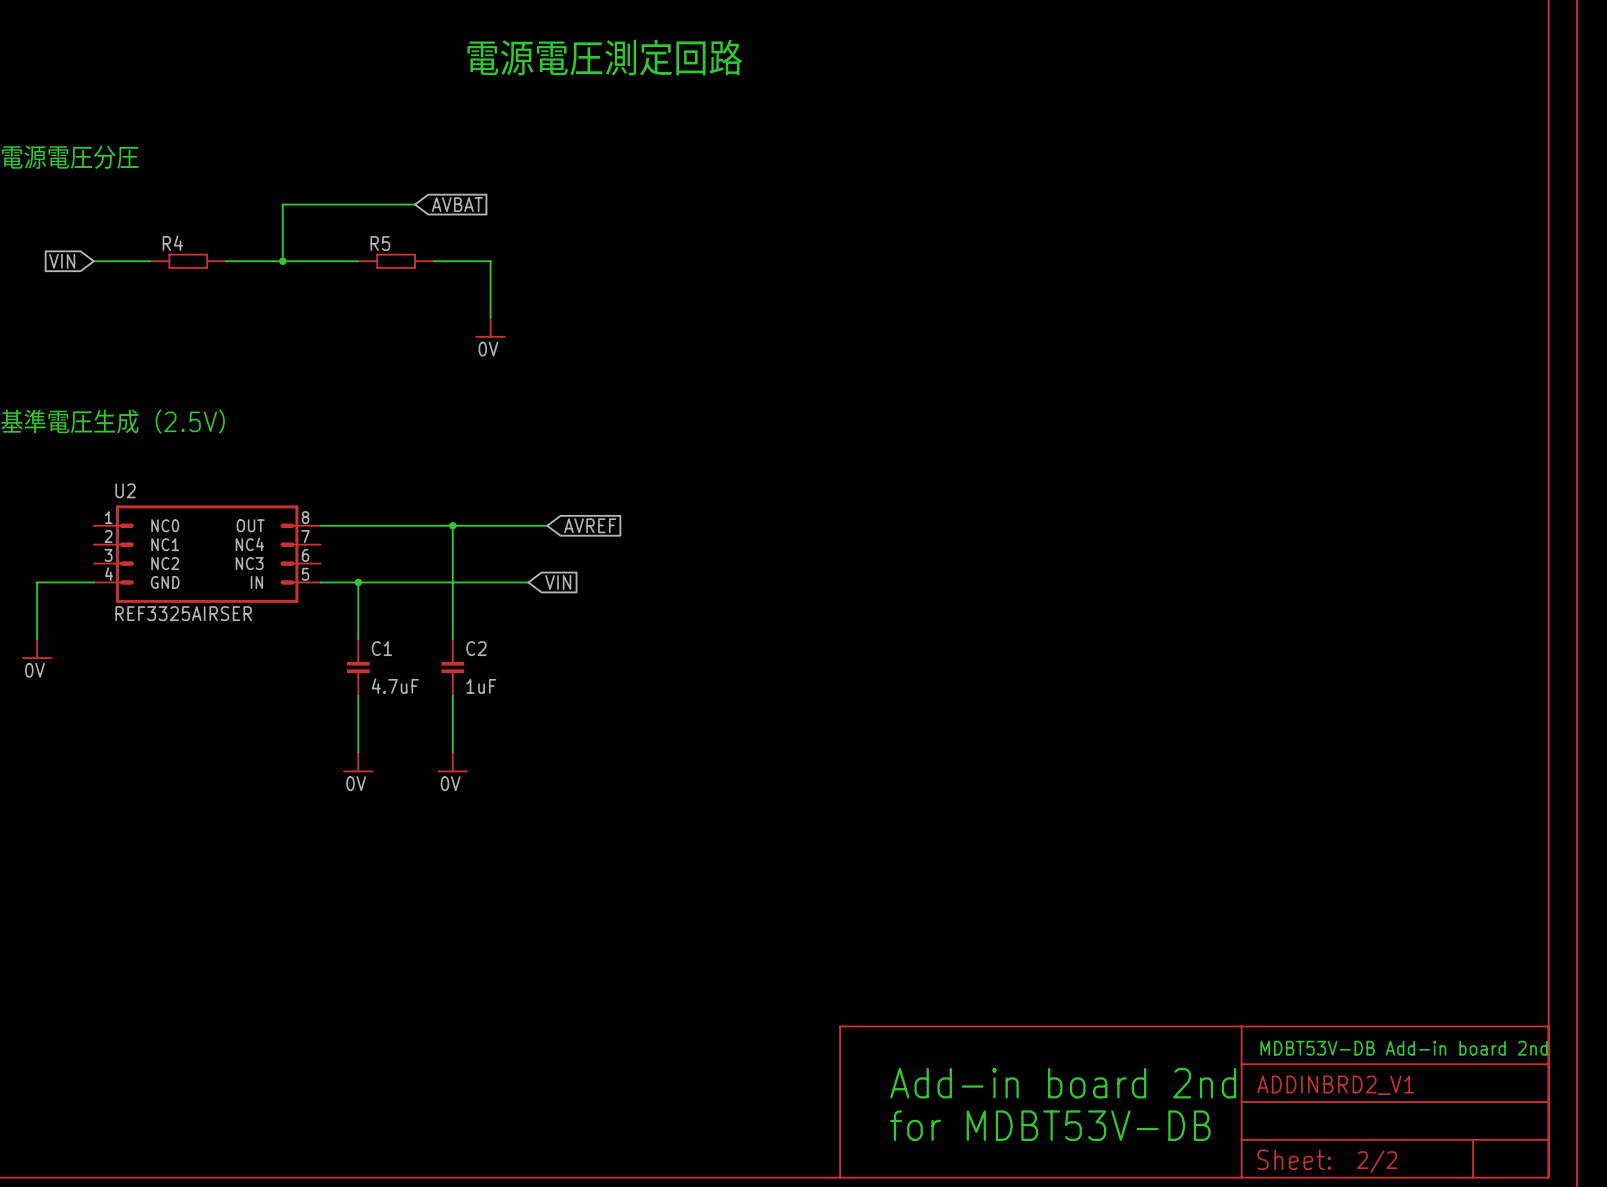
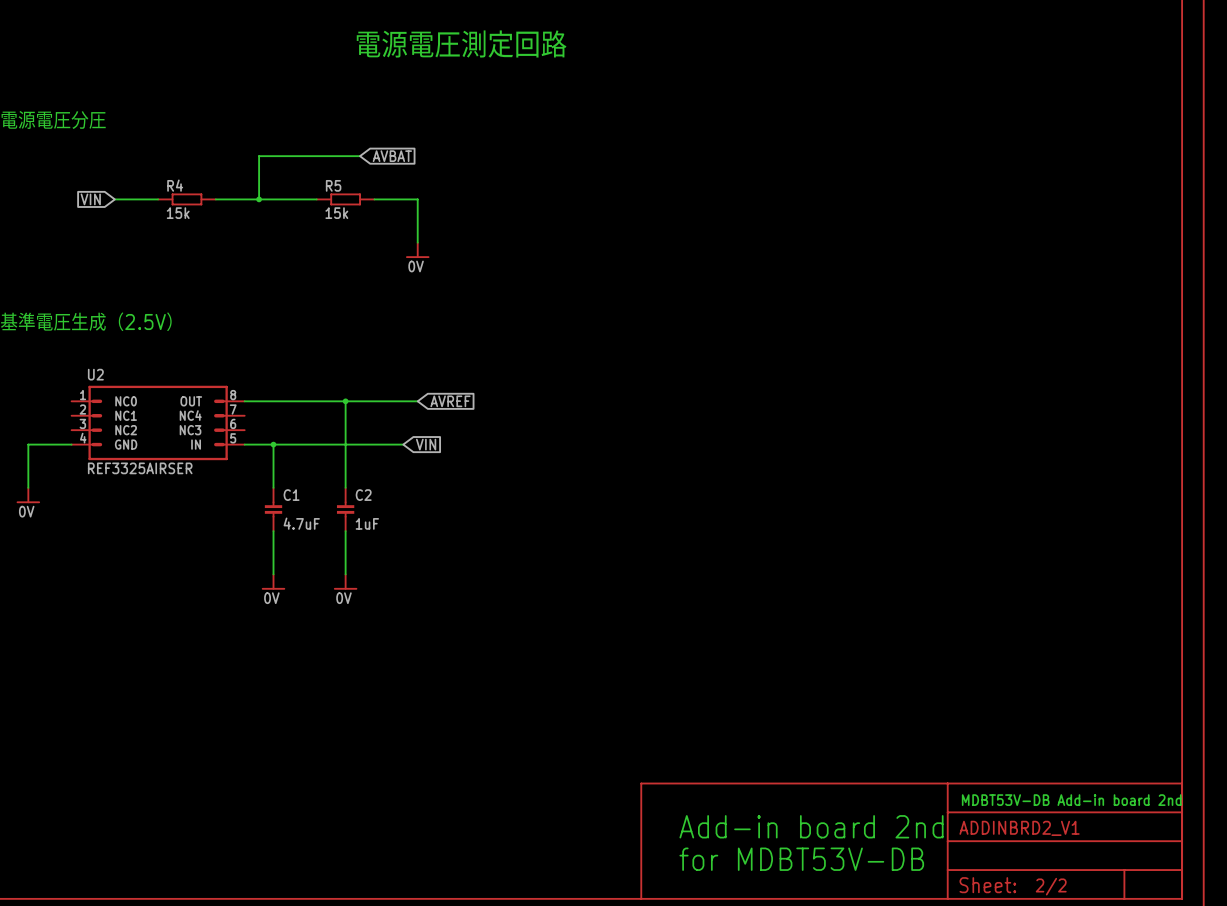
wire: (339, 204) (282, 204) (282, 261) (226, 261) -> (259, 156) (259, 199)
wire: none -> (316, 156) (360, 156)
global label position: AVBAT (457, 204) -> AVBAT (392, 156)
global label position: VIN (62, 261) -> VIN (90, 199)
wire: (93, 261) (150, 261) -> (158, 199) (114, 199)
R4 position: (188, 261) -> (186, 199)
junction: (282, 261) -> none
junction: none -> (259, 199)
wire: none -> (273, 199) (316, 199)
R5 position: (396, 261) -> (345, 199)
wire: (433, 261) (490, 261) (490, 317) -> (374, 199) (417, 199) (417, 242)
R4 value: none -> 15k (178, 213)
R5 value: none -> 15k (336, 213)
power symbol position: 0V (490, 327) -> 0V (417, 250)

